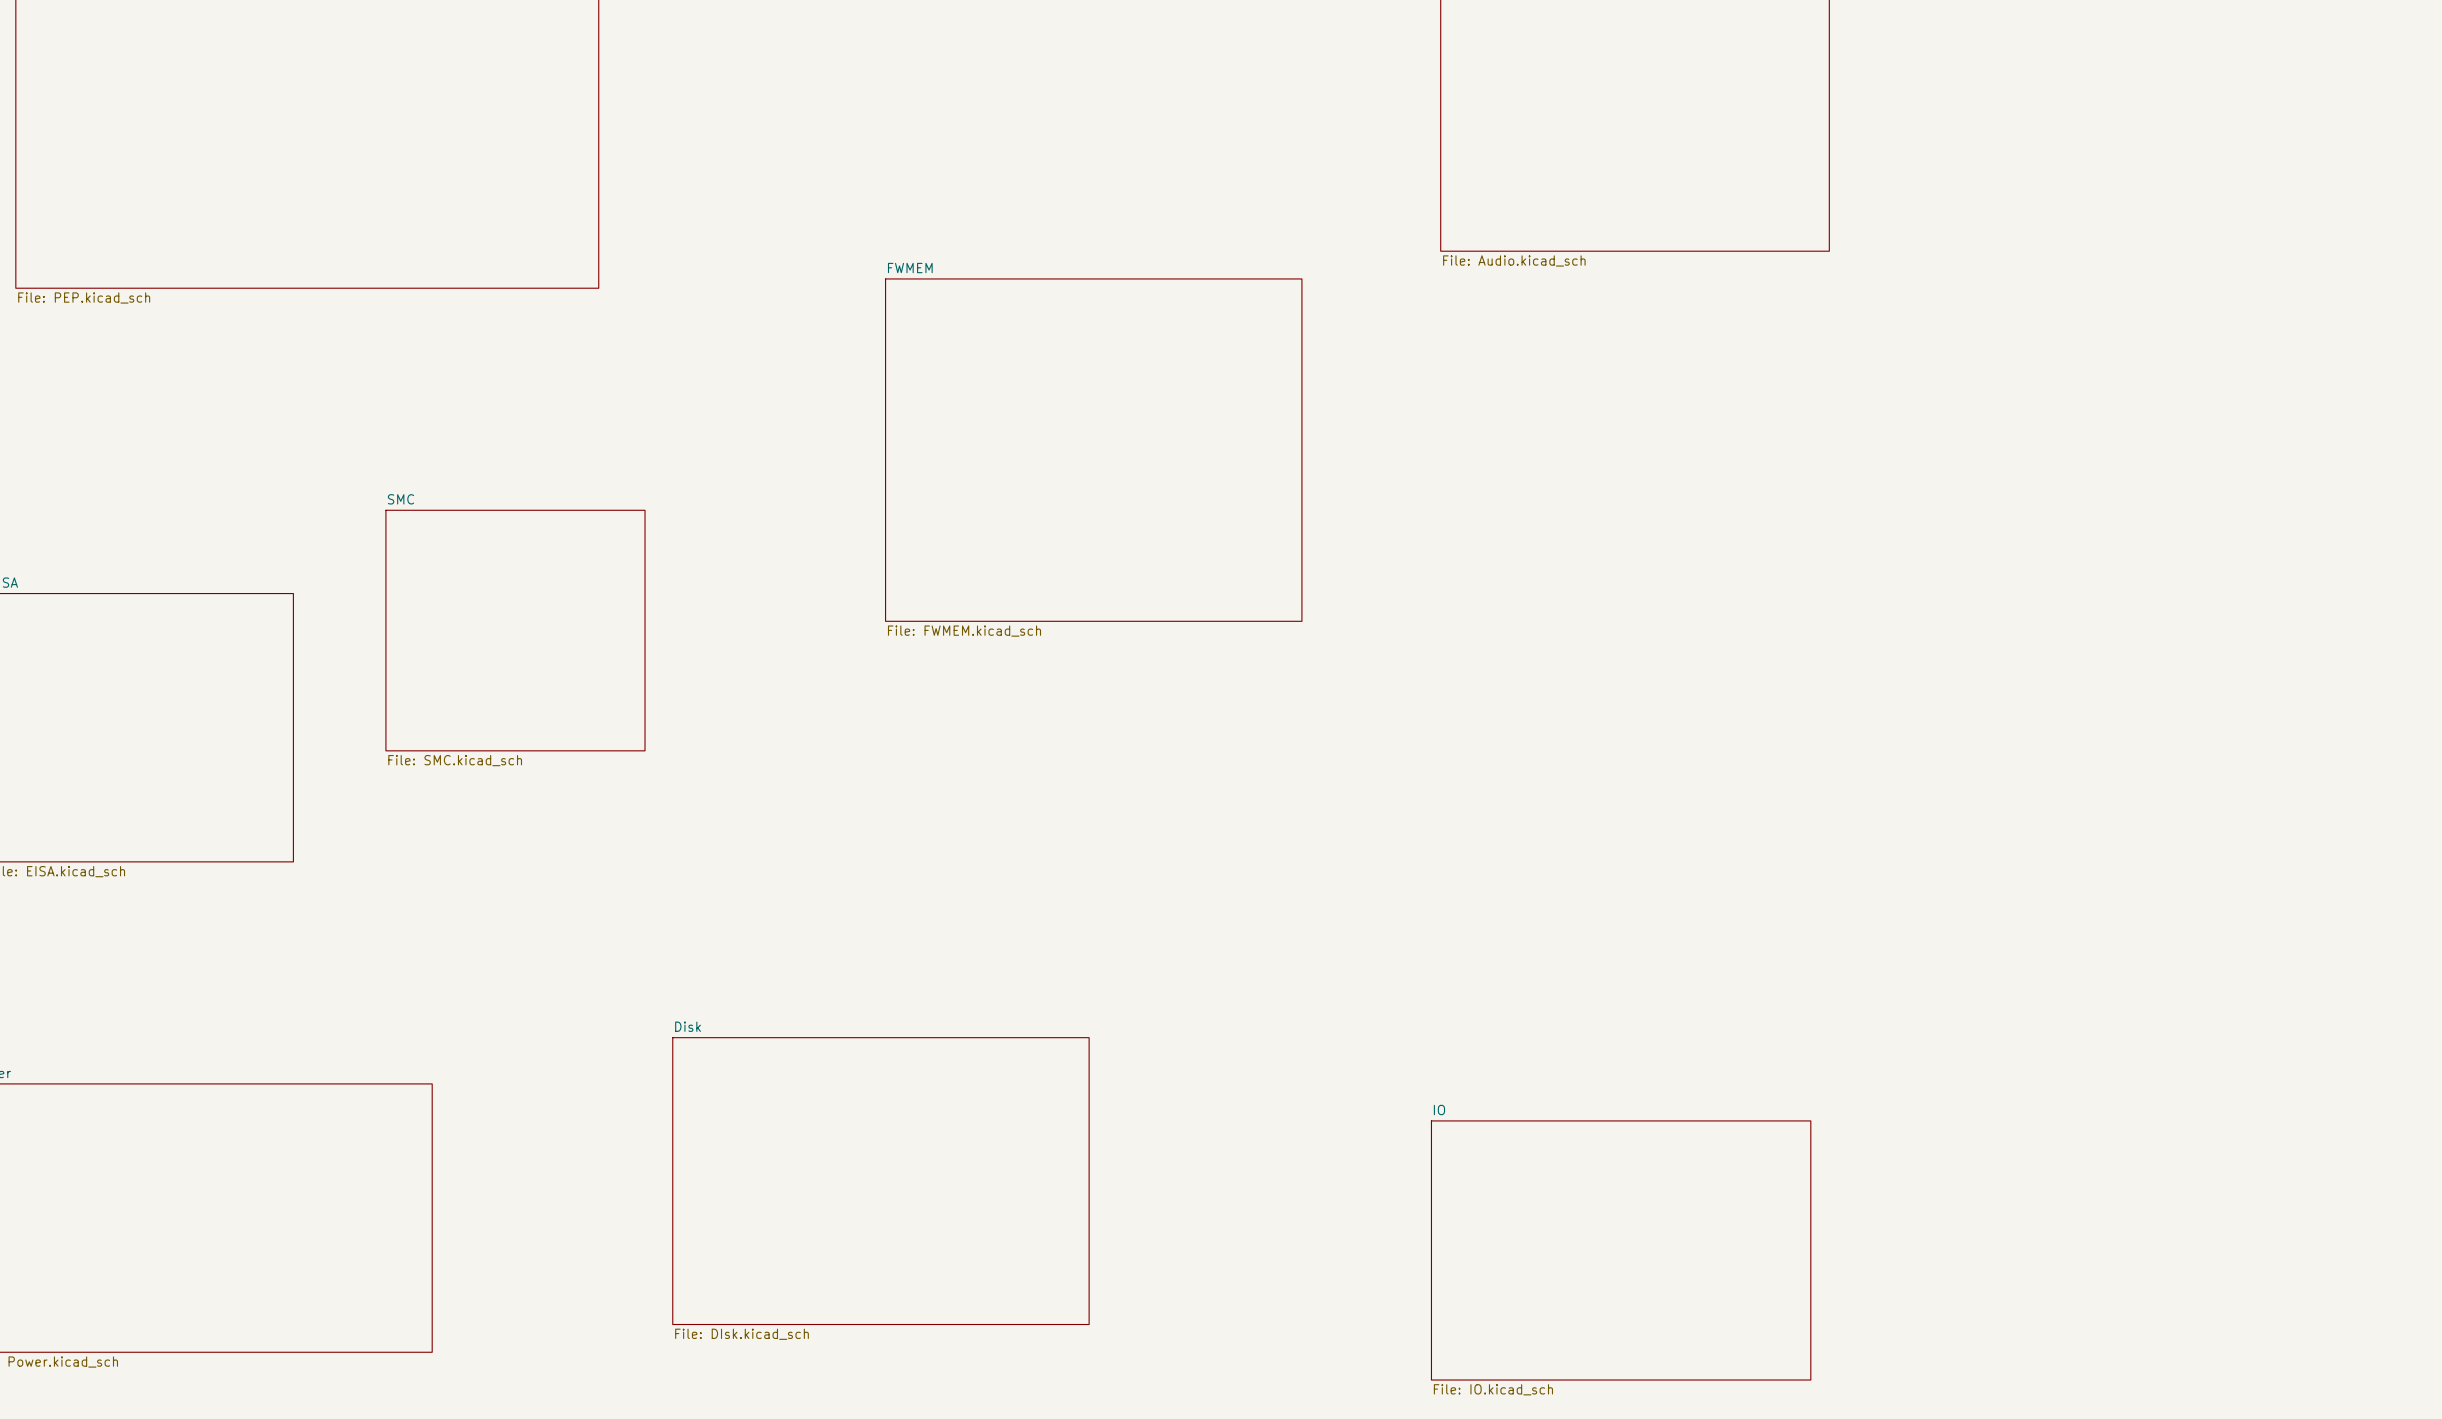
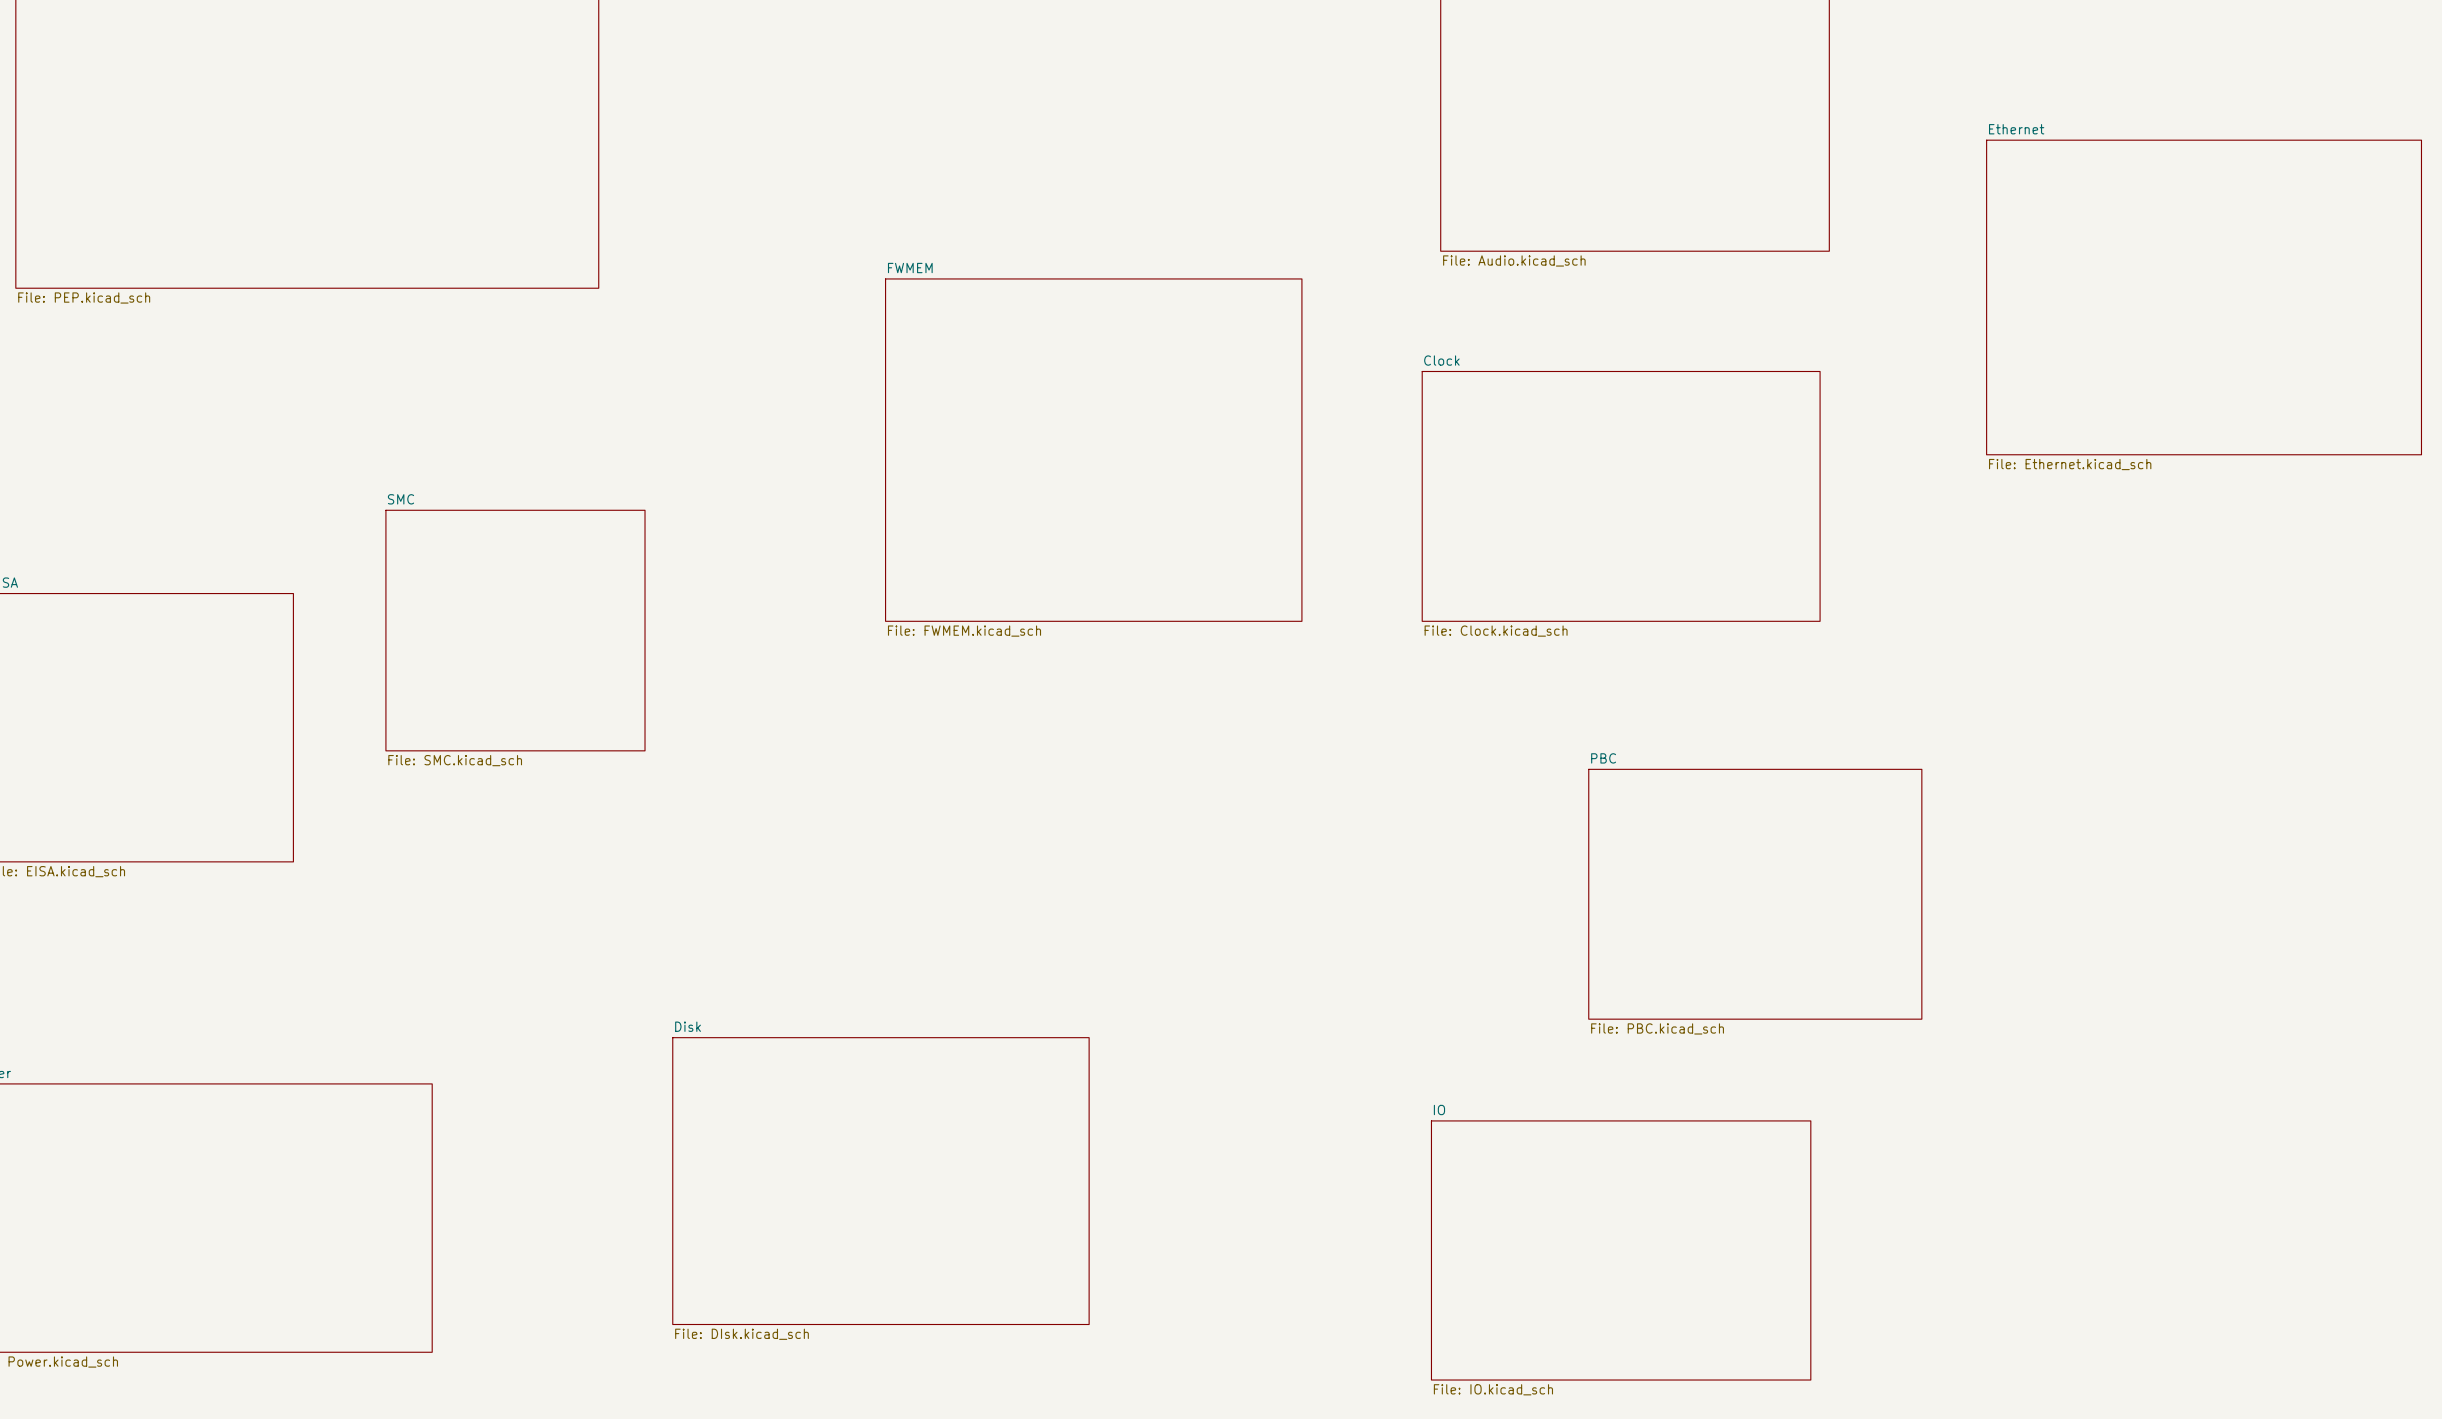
sheet Ethernet: none -> File: Ethernet.kicad_sch (2204, 297)
sheet Clock: none -> File: Clock.kicad_sch (1621, 496)
sheet PBC: none -> File: PBC.kicad_sch (1755, 894)

